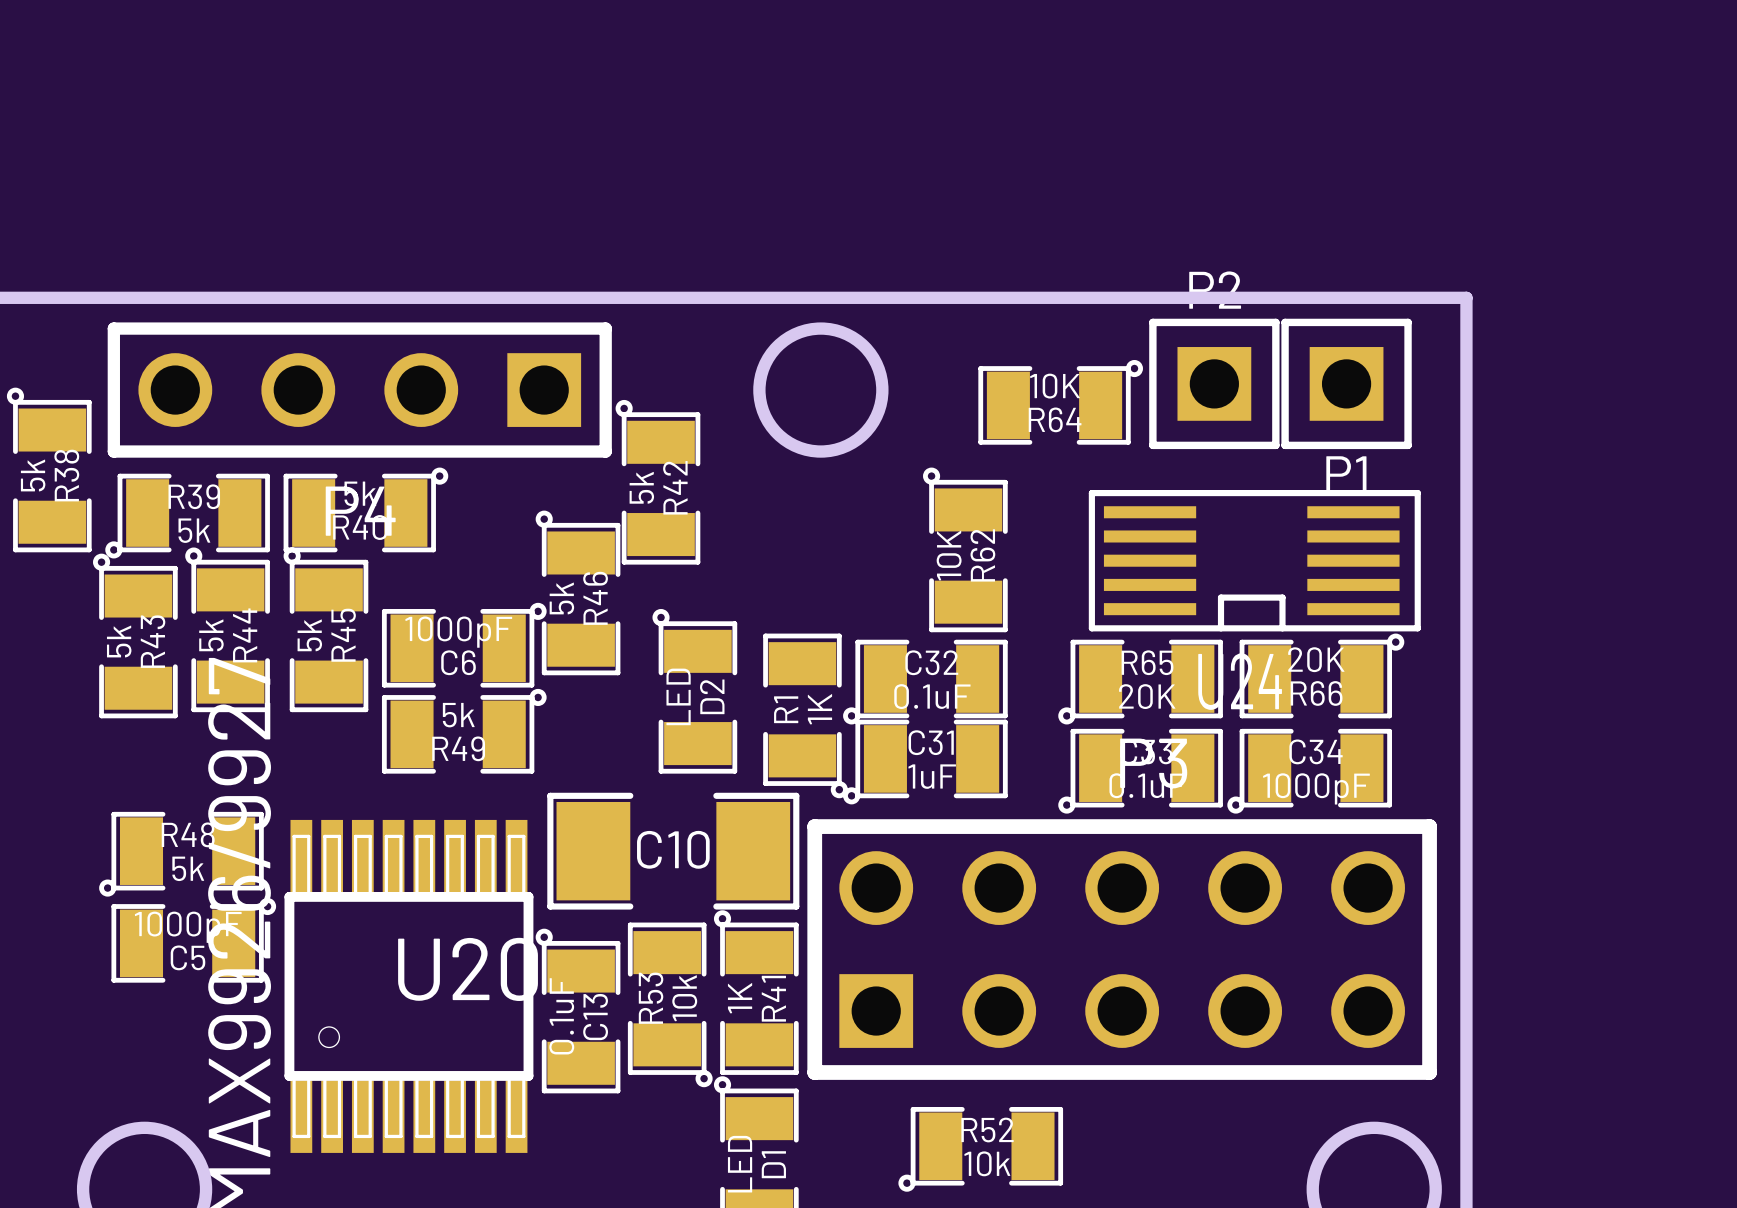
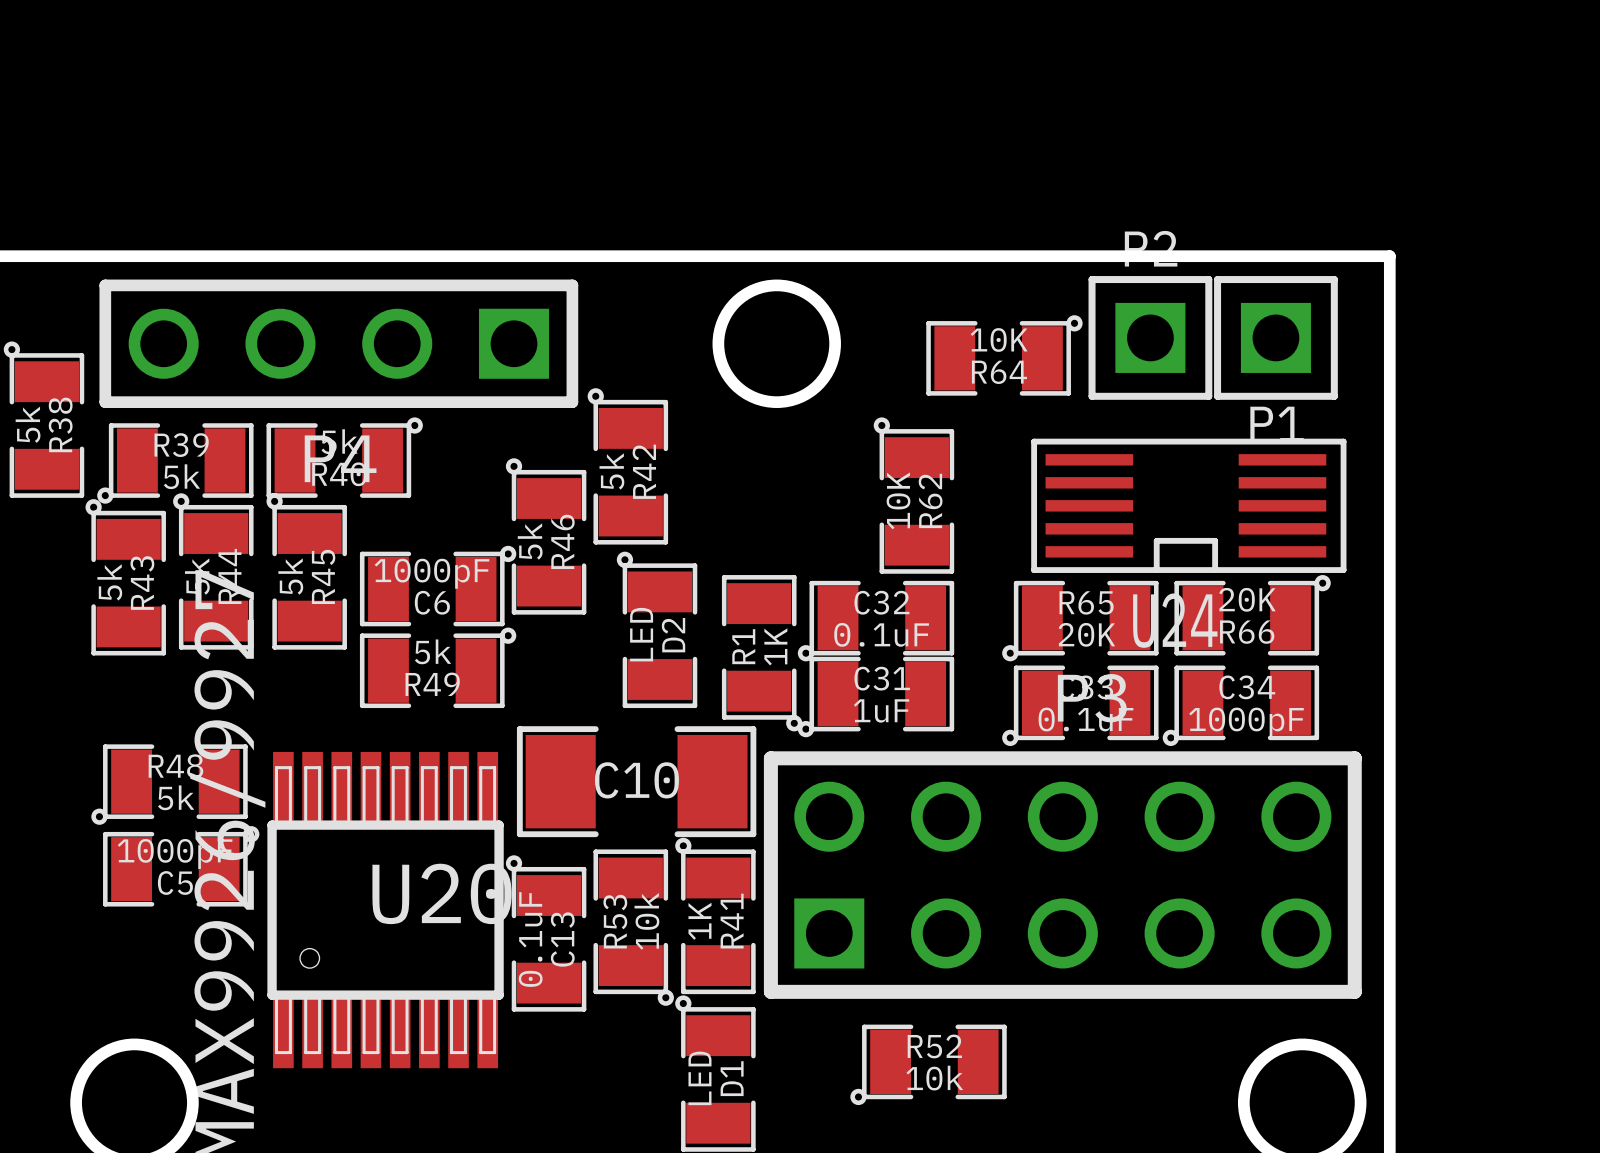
R42 position: (657, 482) -> (627, 466)

